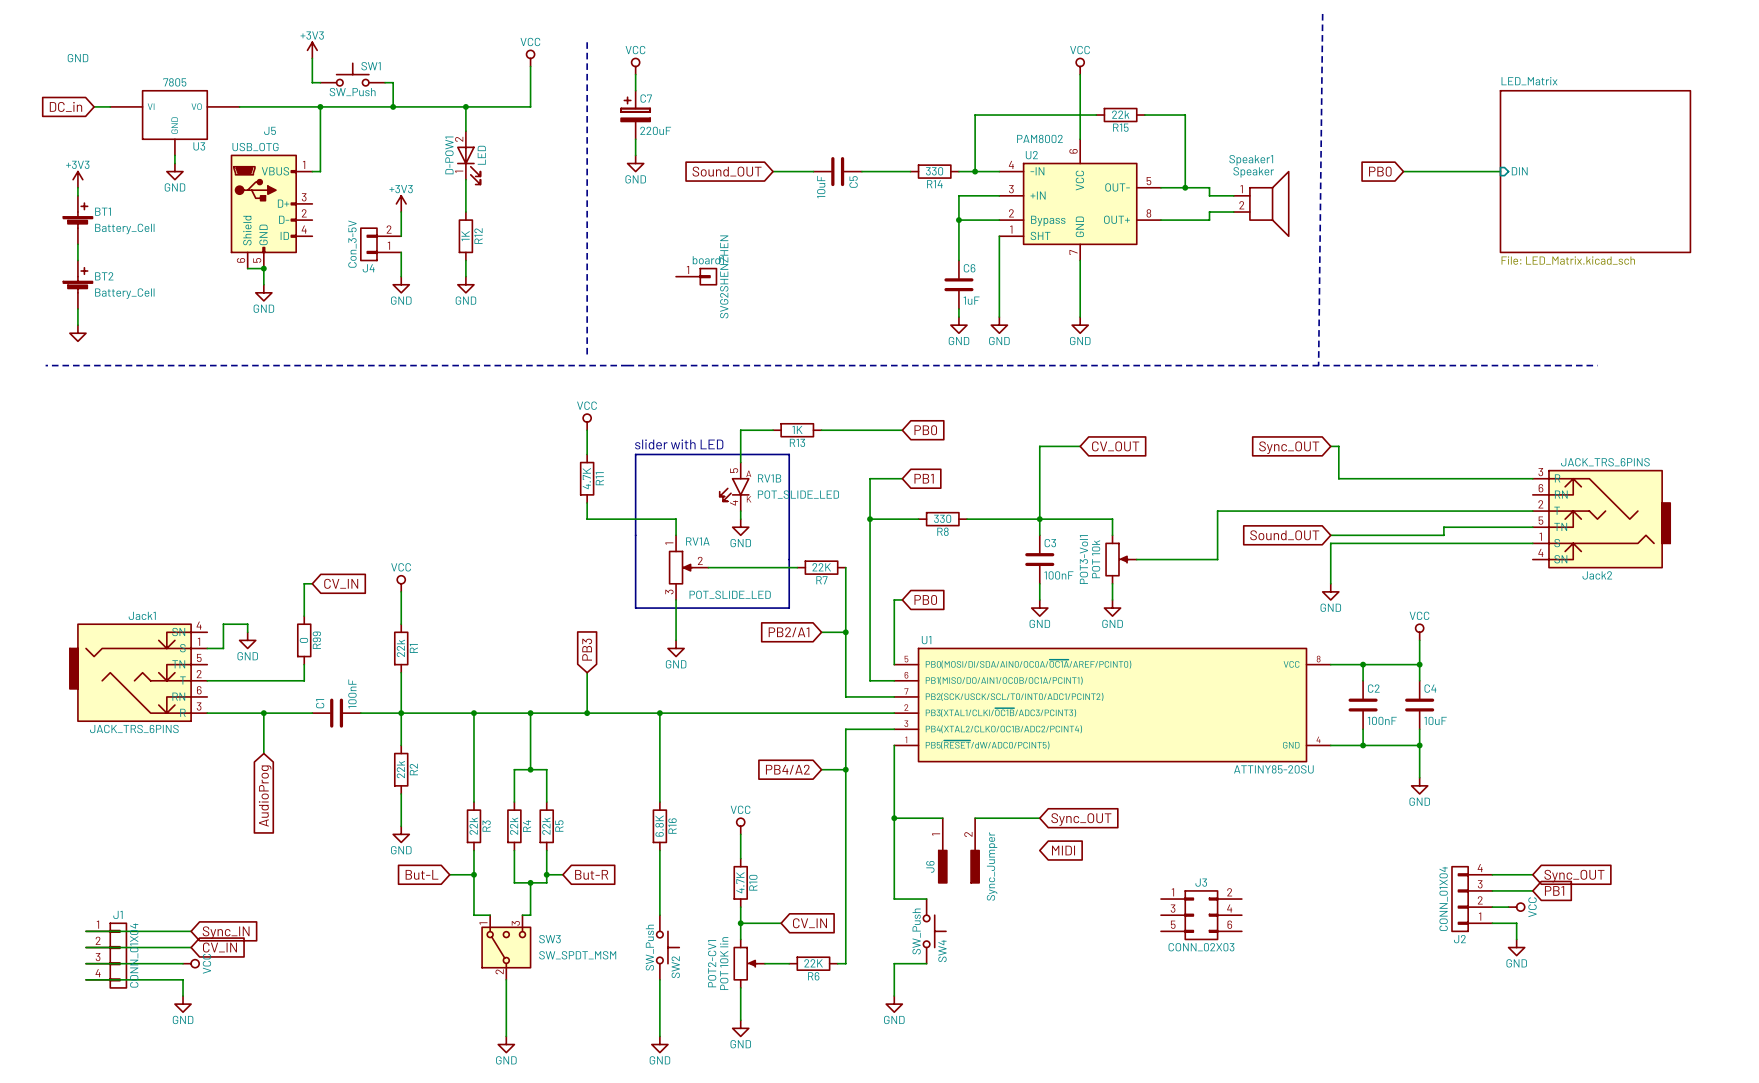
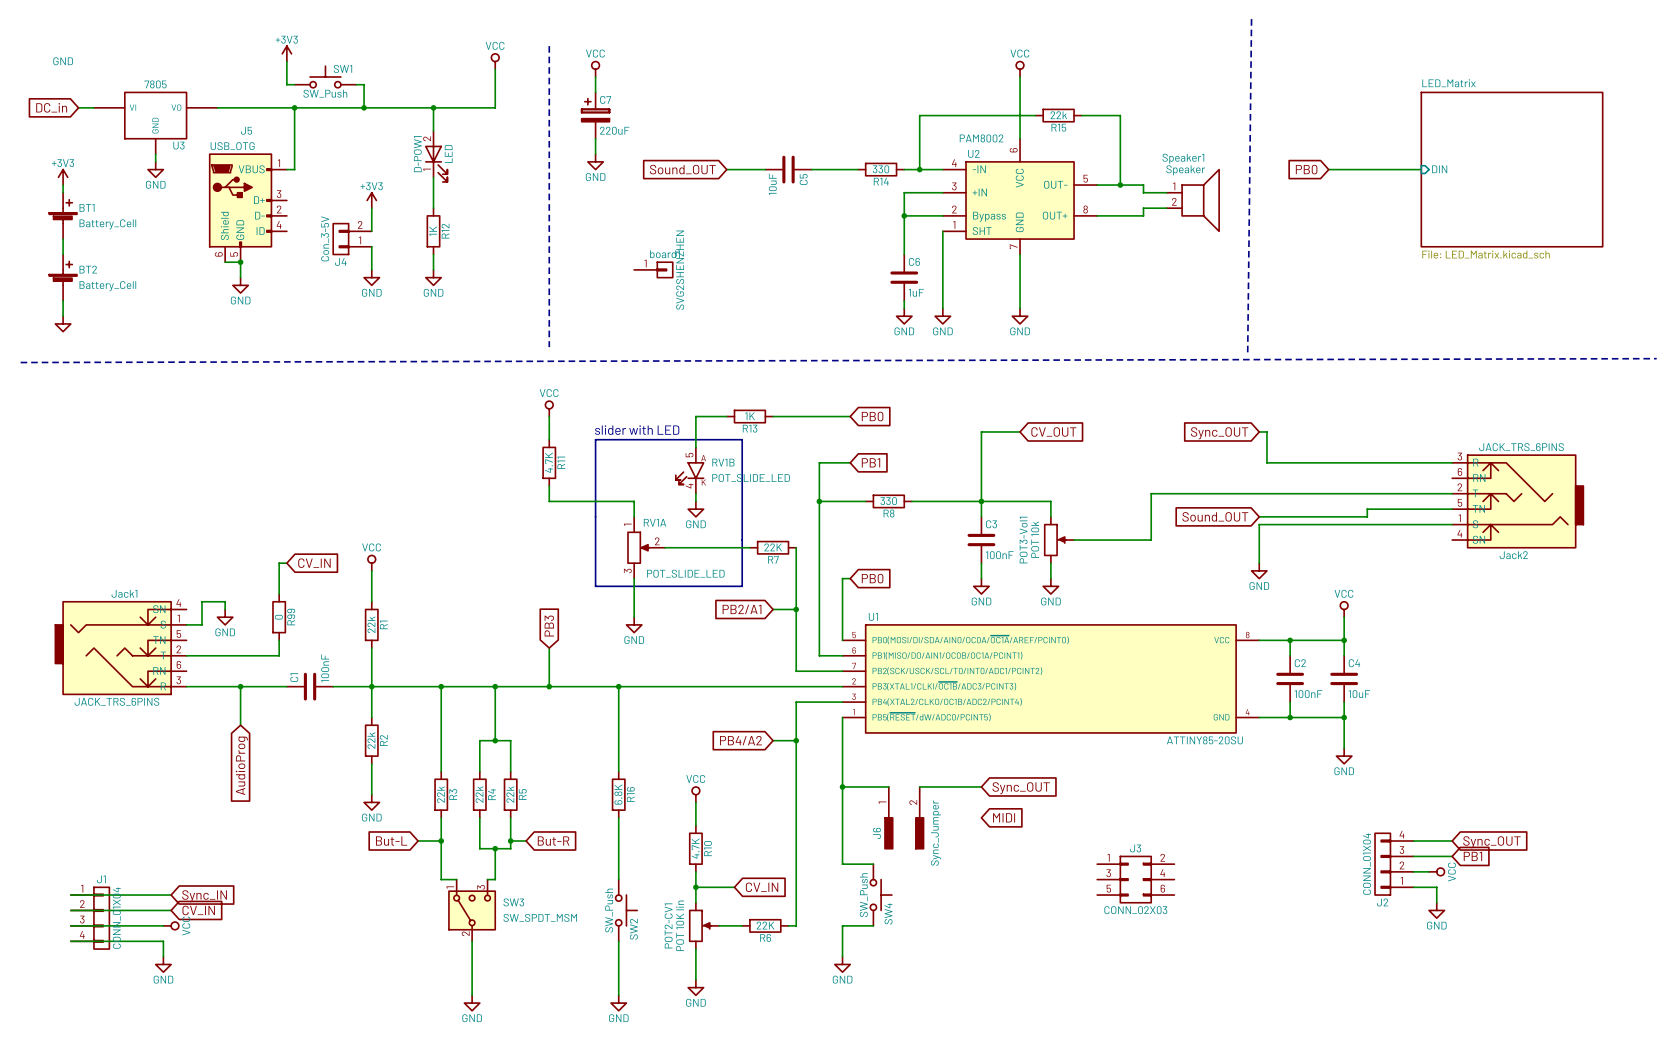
line: (45, 365) (1597, 365) -> none
line: none -> (1656, 358) (20, 362)

